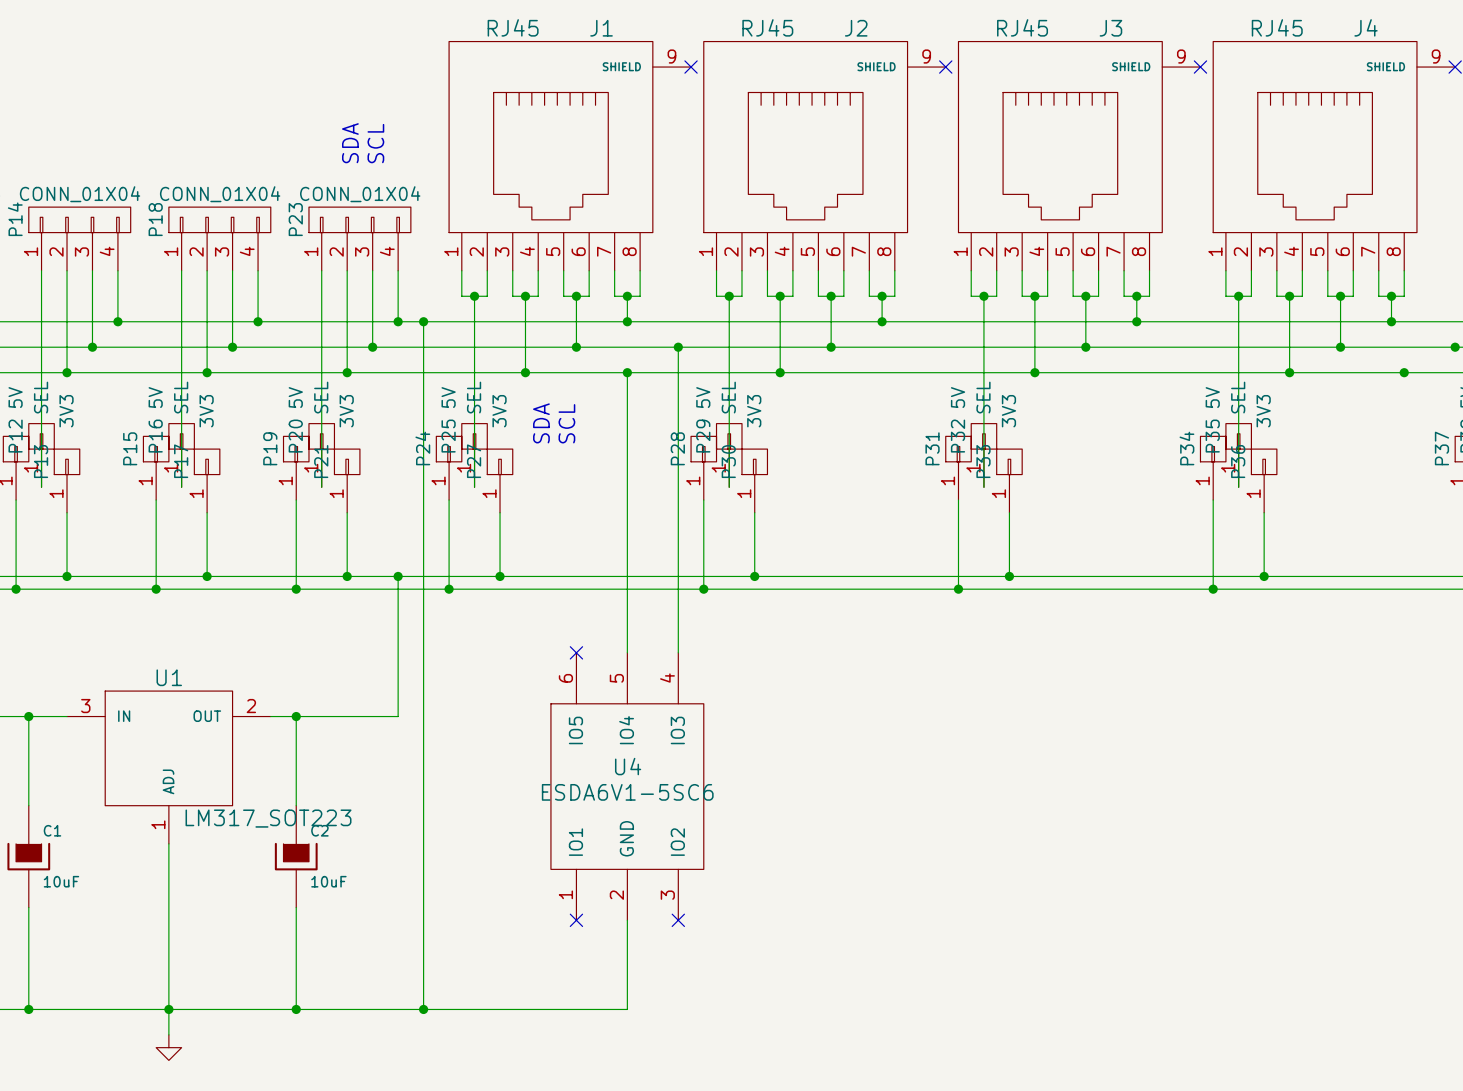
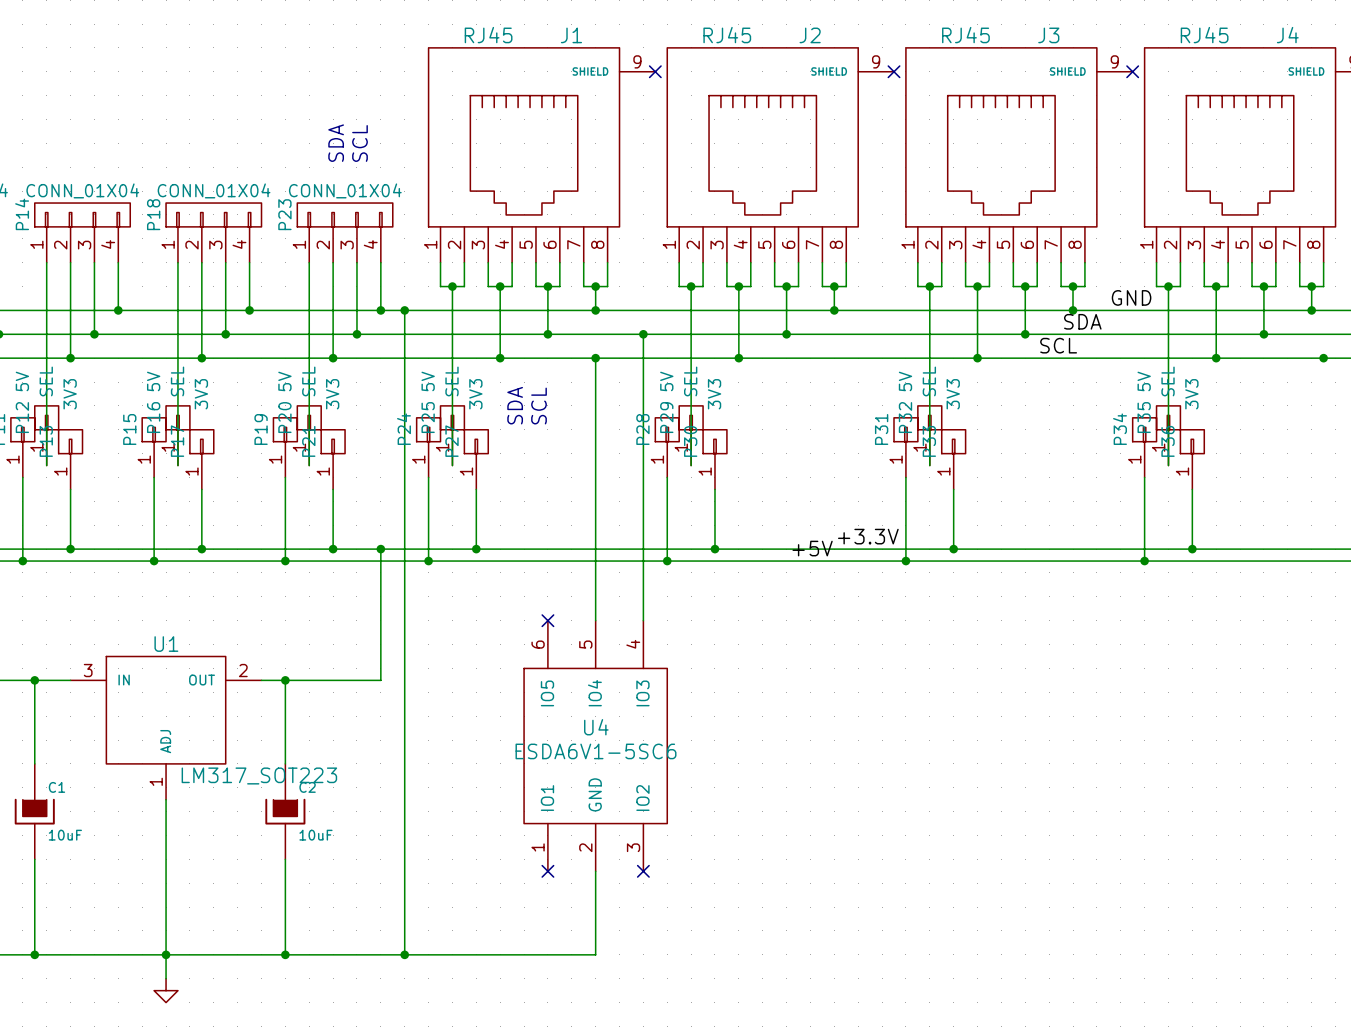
label: none -> GND (1131, 297)
label: none -> SDA (1082, 321)
label: none -> SCL (1058, 345)
label: none -> +3.3V (868, 536)
label: none -> +5V (812, 548)

